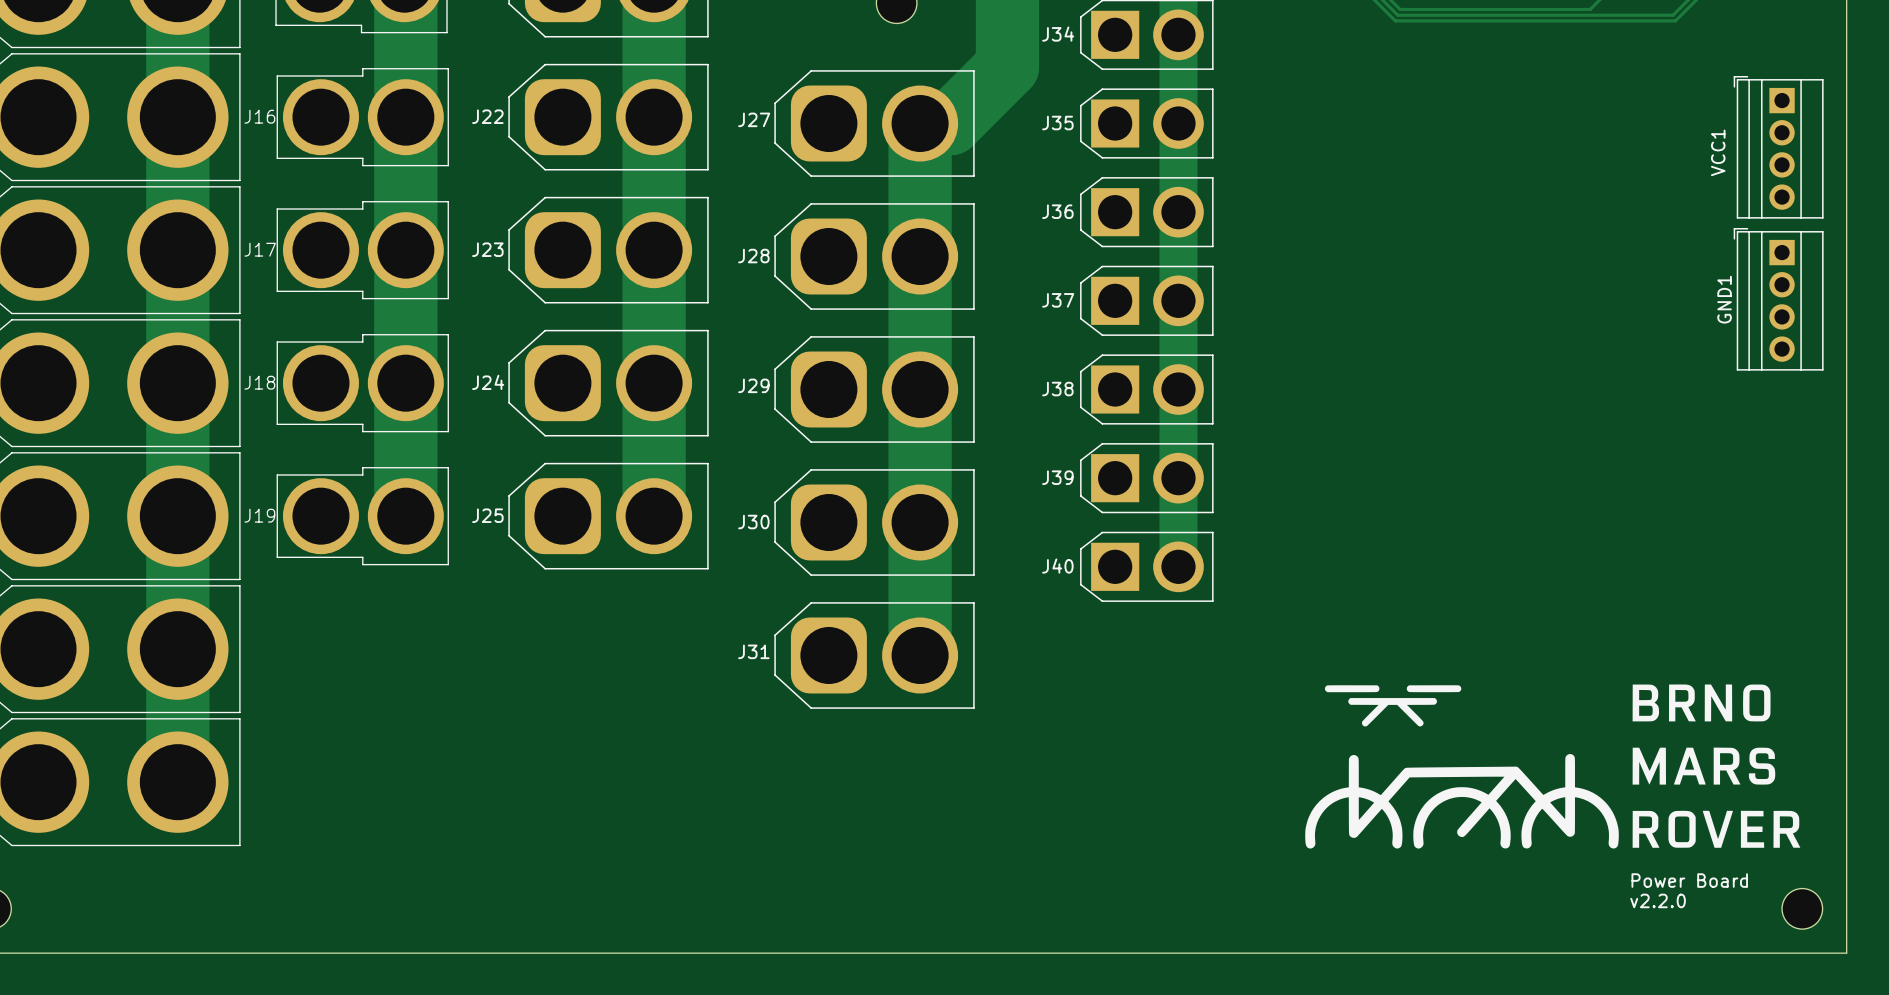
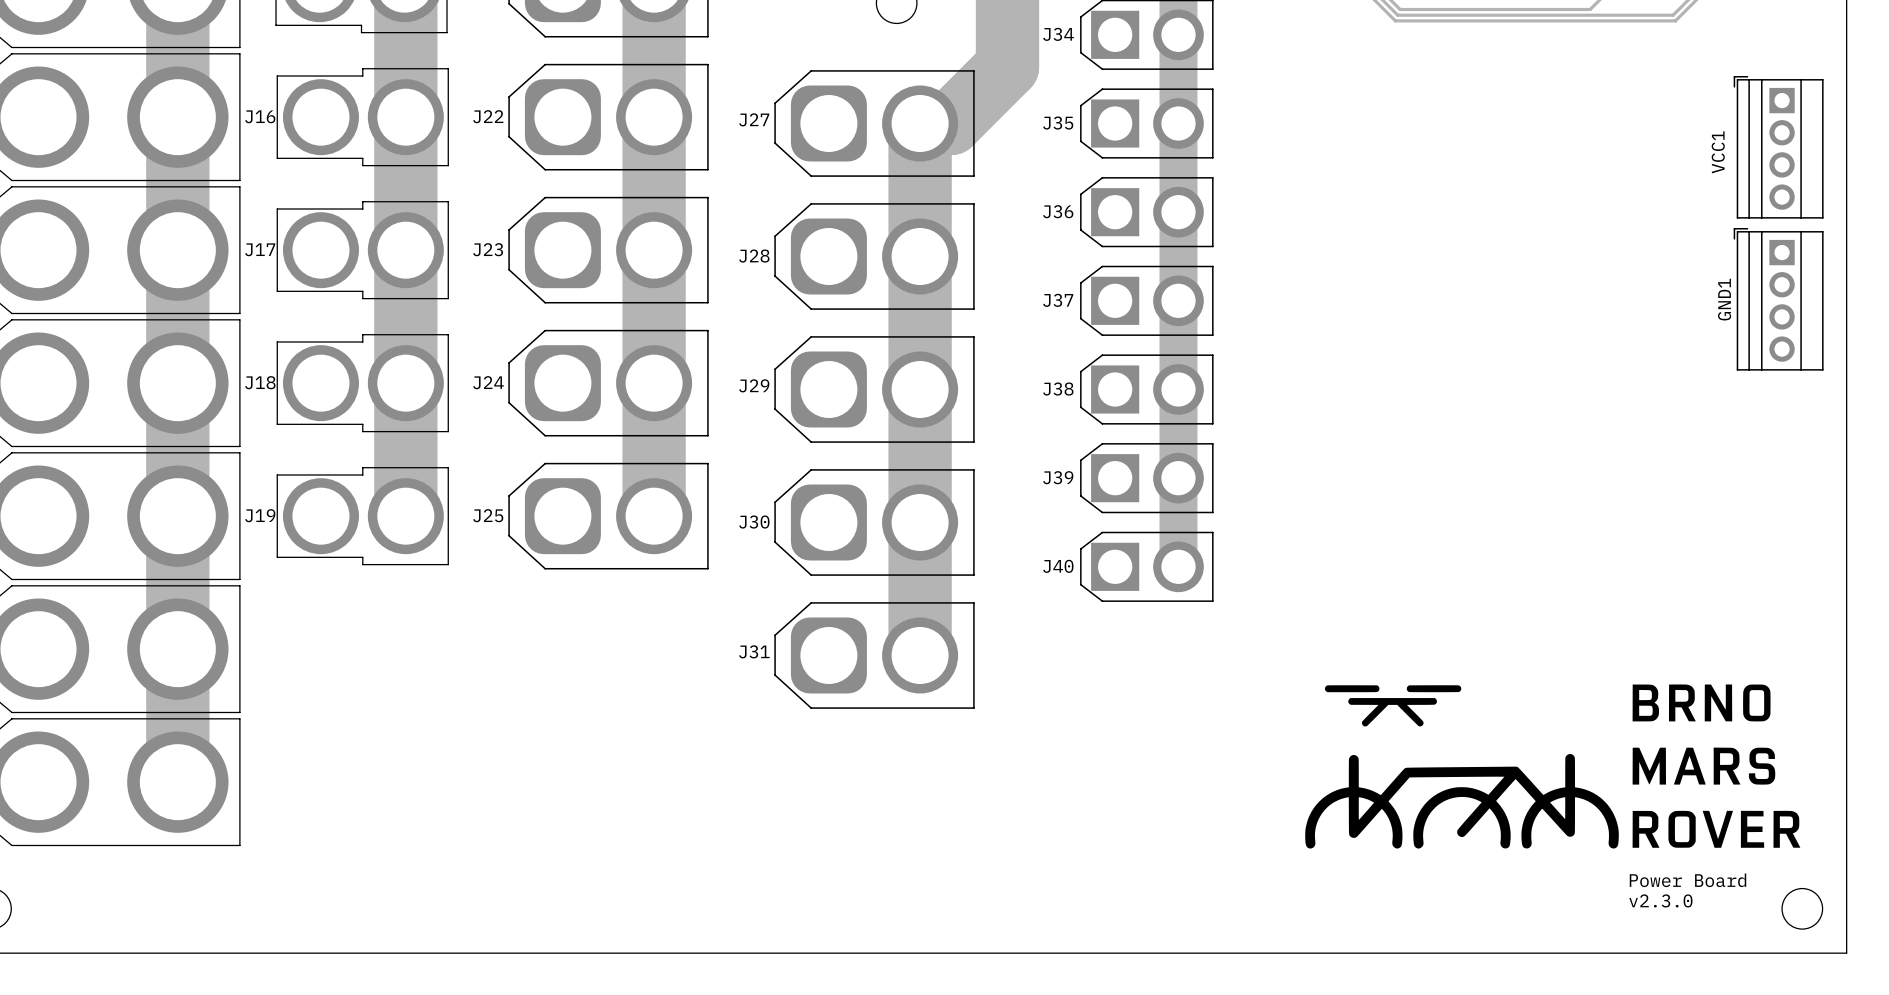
text: v2.2.0 (1658, 900) -> v2.3.0 (1660, 900)

